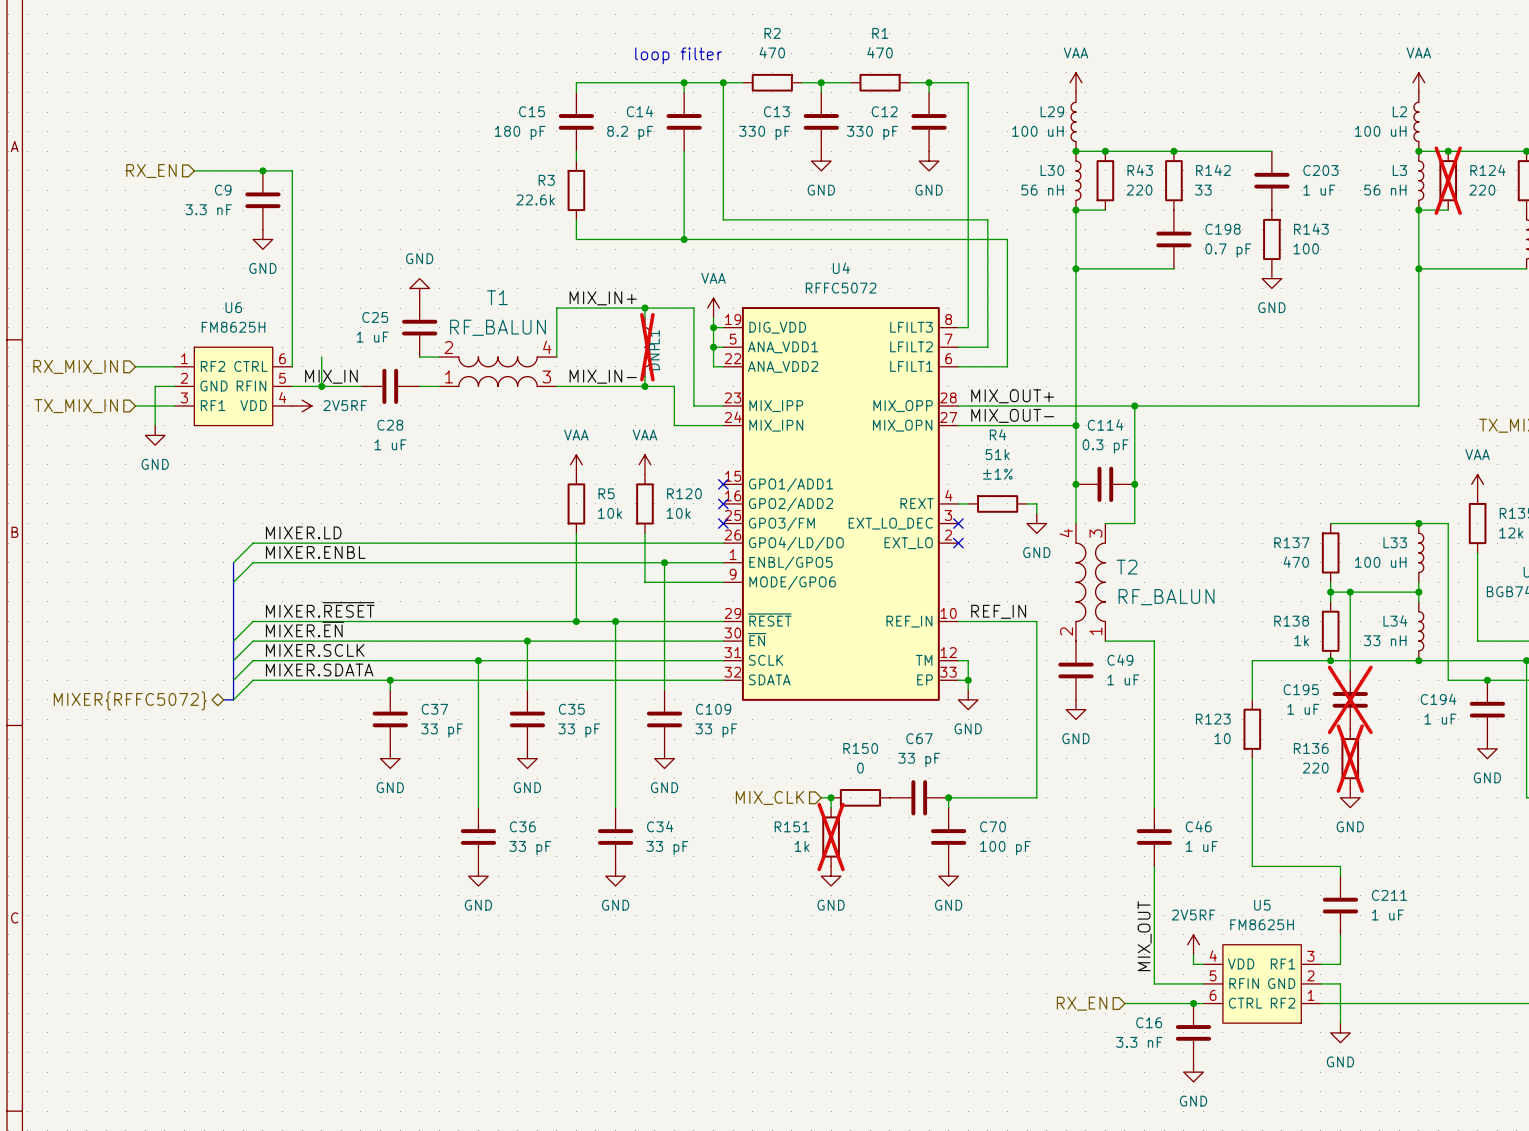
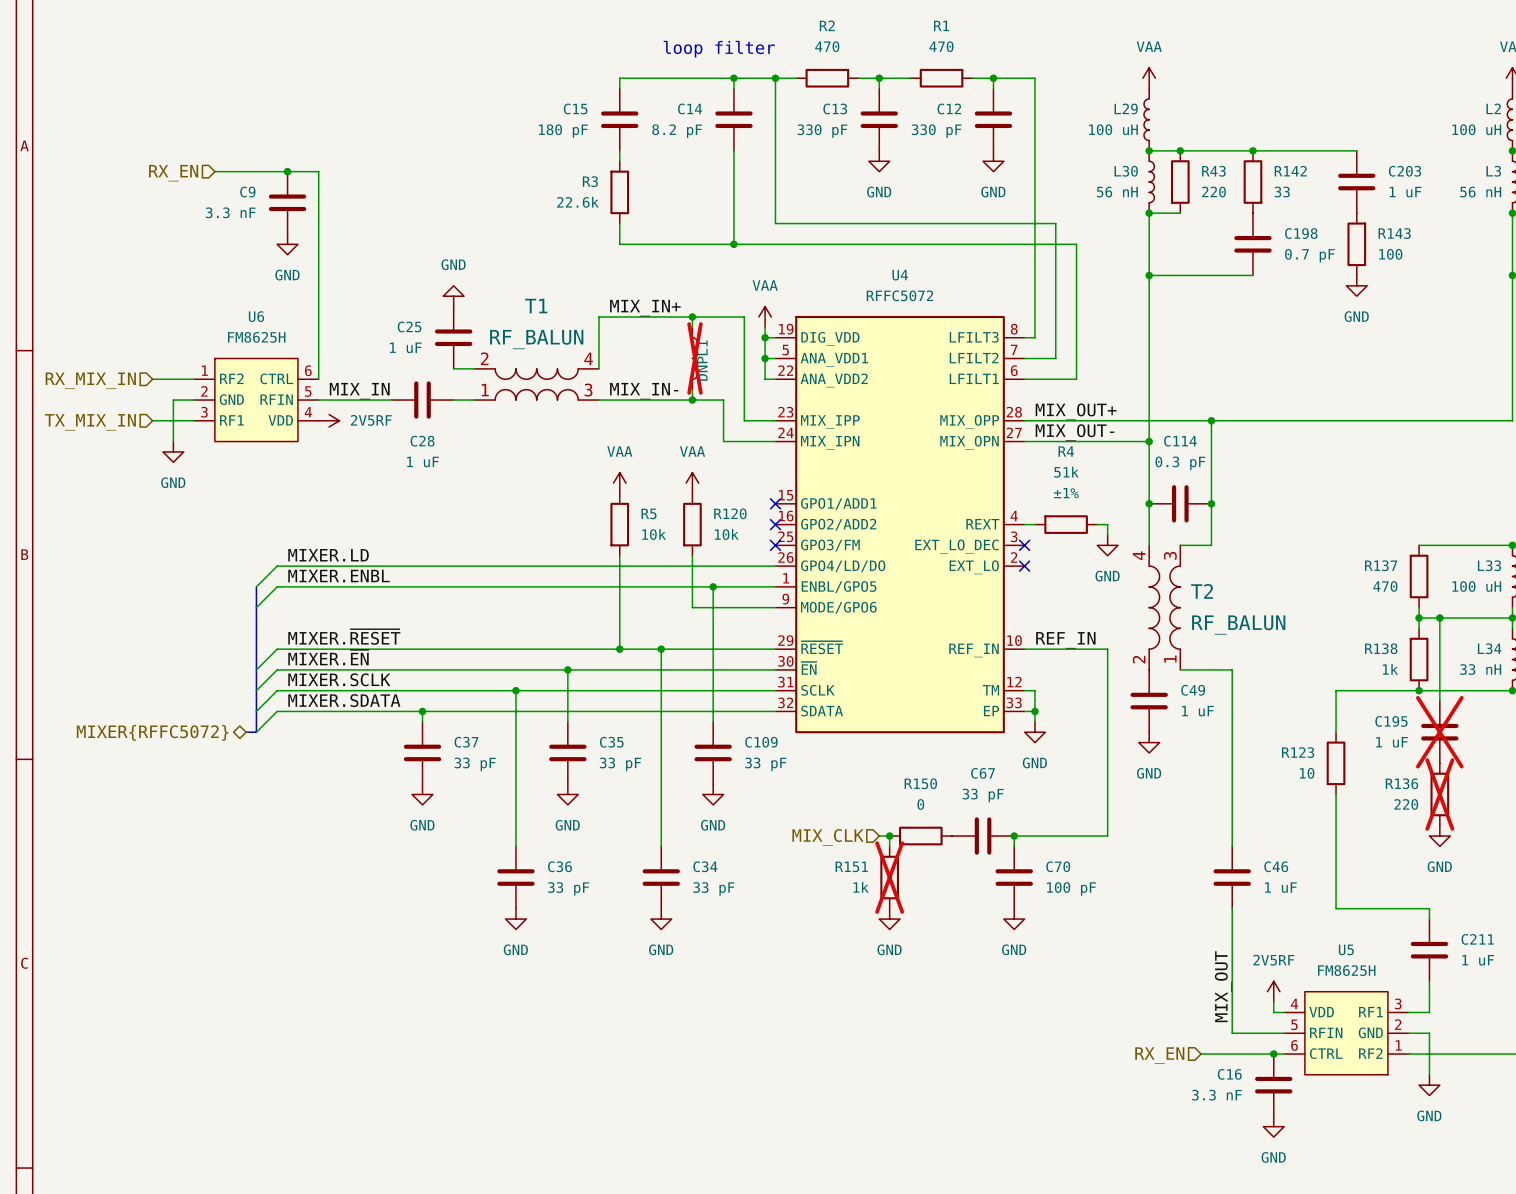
wire: (321, 357) (321, 386) -> none
junction: (321, 386) -> none

